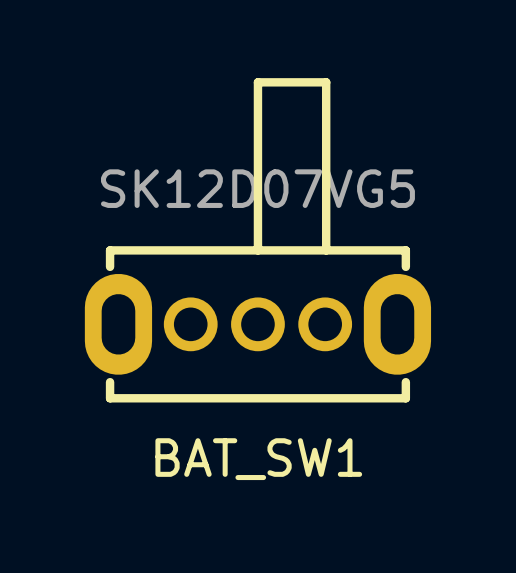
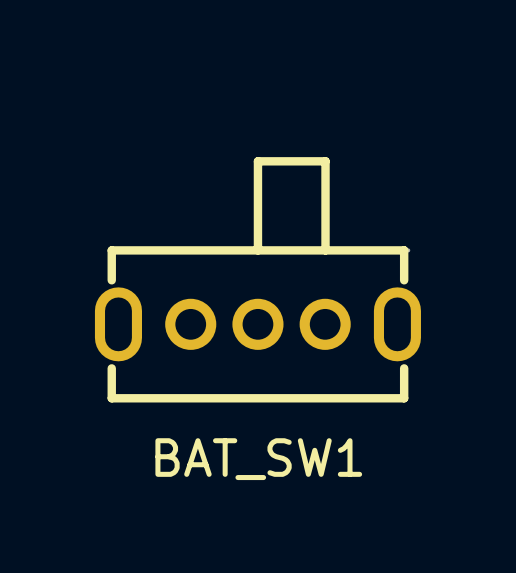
BAT_SW1 footprint: [84, 78, 432, 403] -> [94, 157, 421, 403]
BAT_SW1 value: SK12D07VG5 (257, 188) -> none

